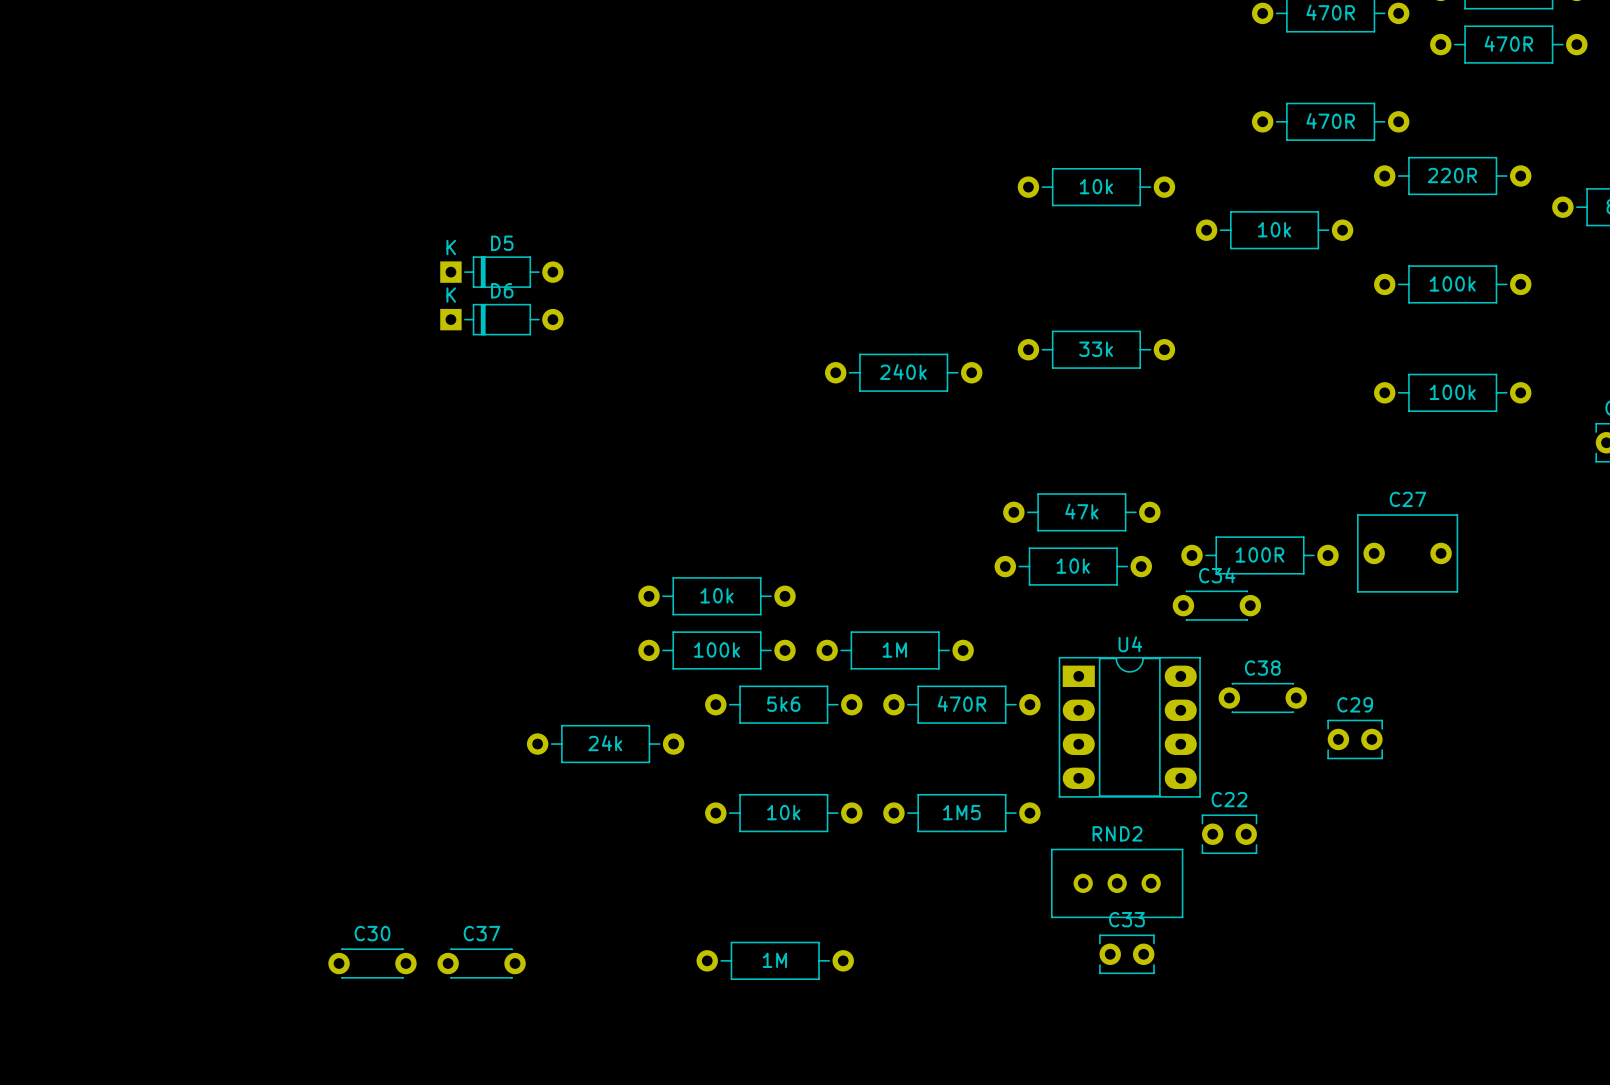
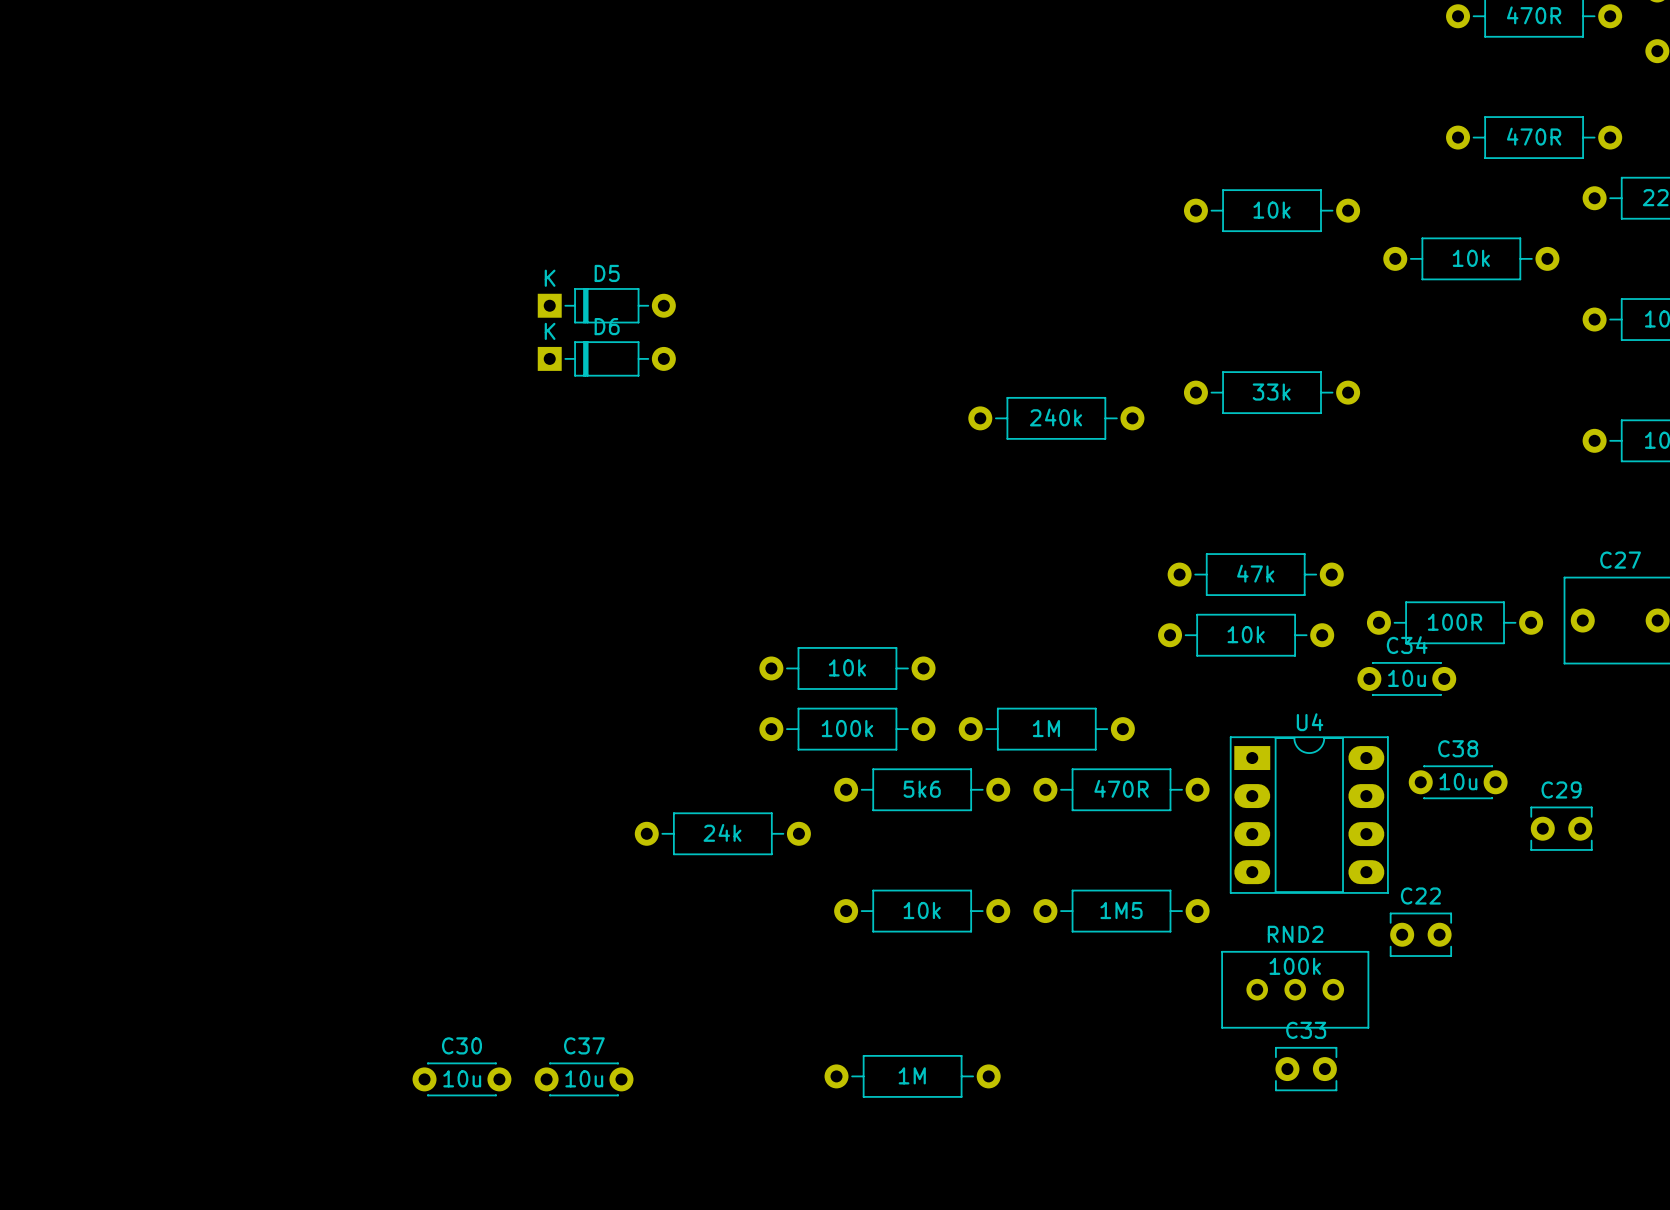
C34 value: none -> 10u (1407, 678)
C38 value: none -> 10u (1458, 781)
RND2 value: none -> 100k (1295, 966)
C30 value: none -> 10u (462, 1078)
C37 value: none -> 10u (584, 1078)

